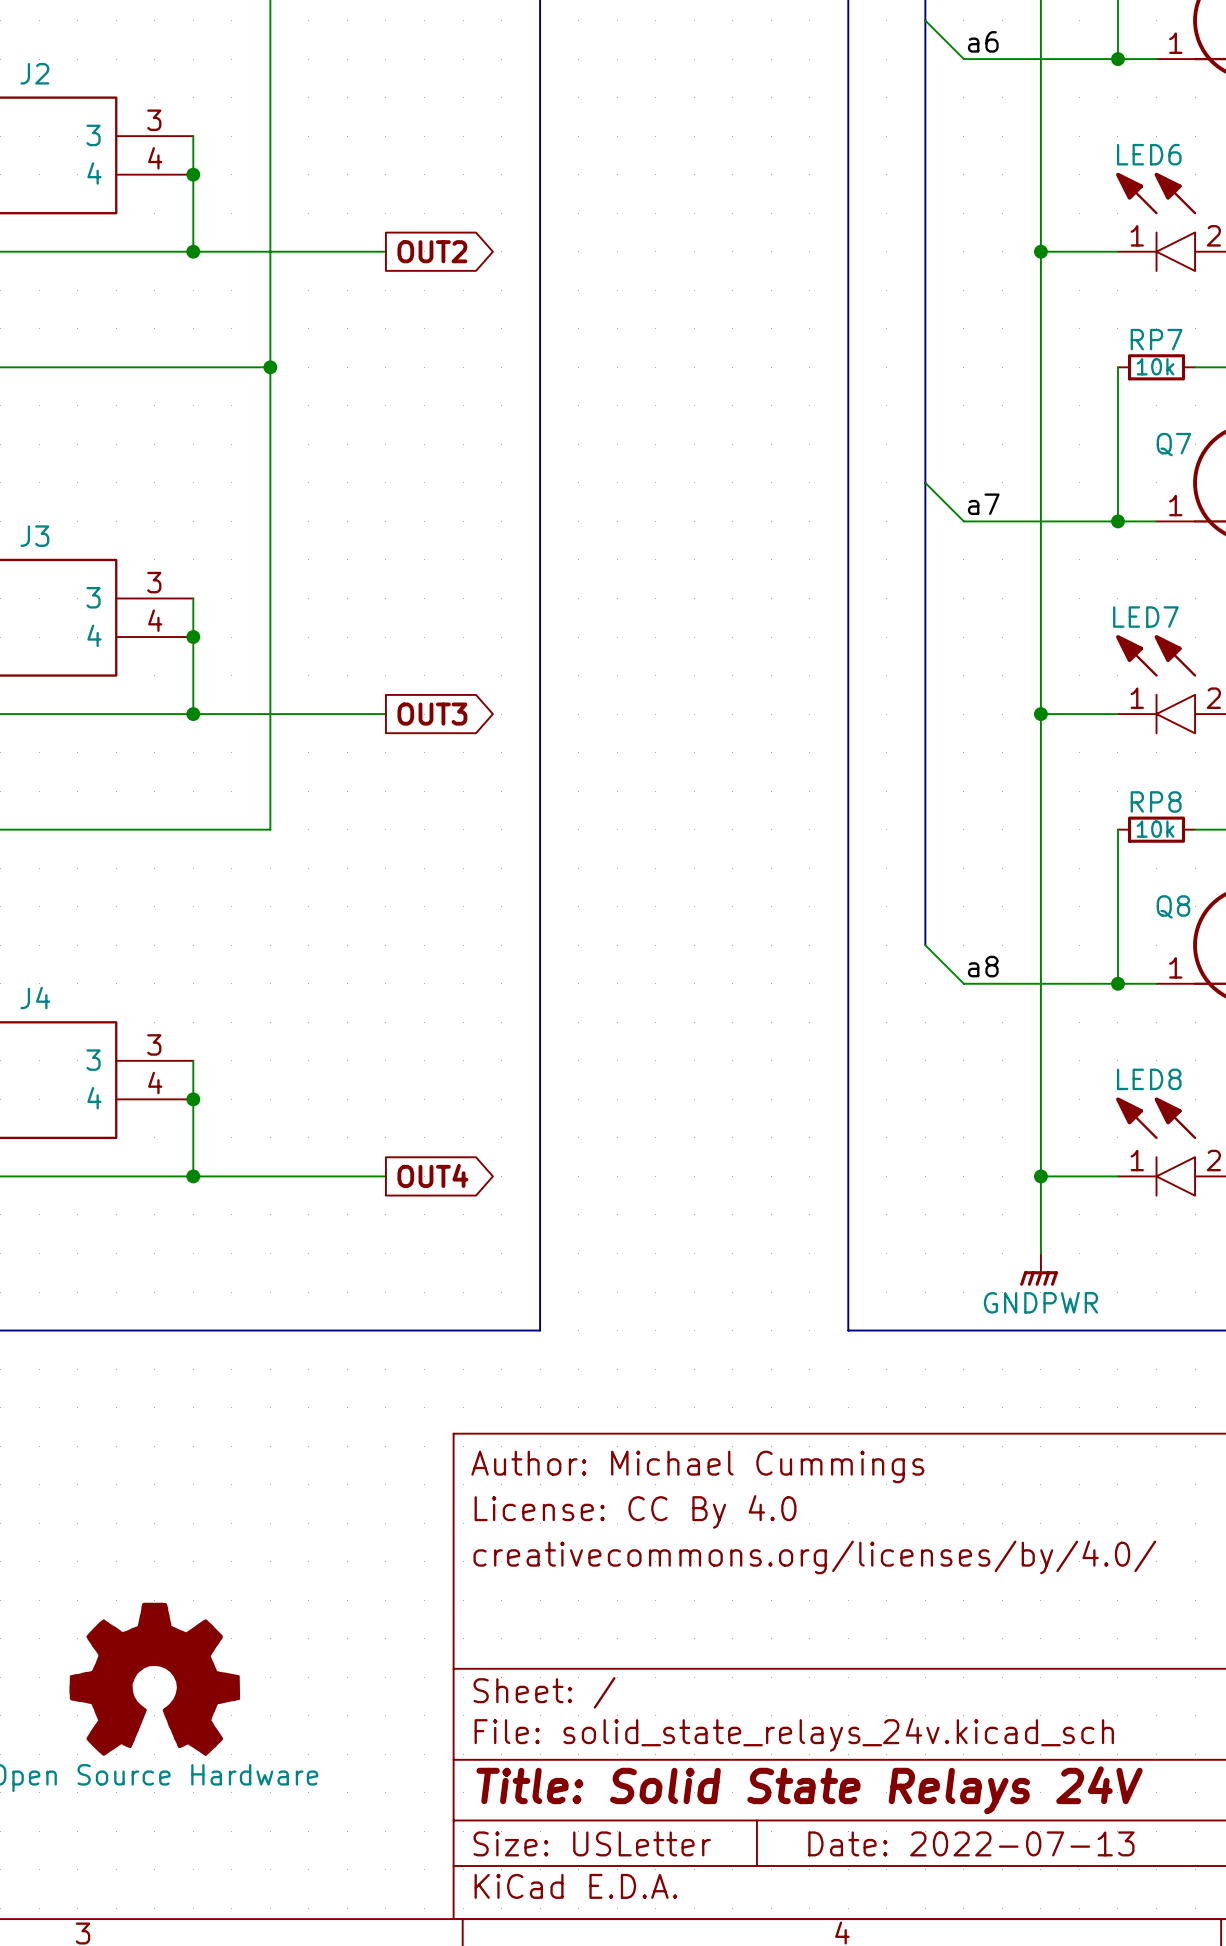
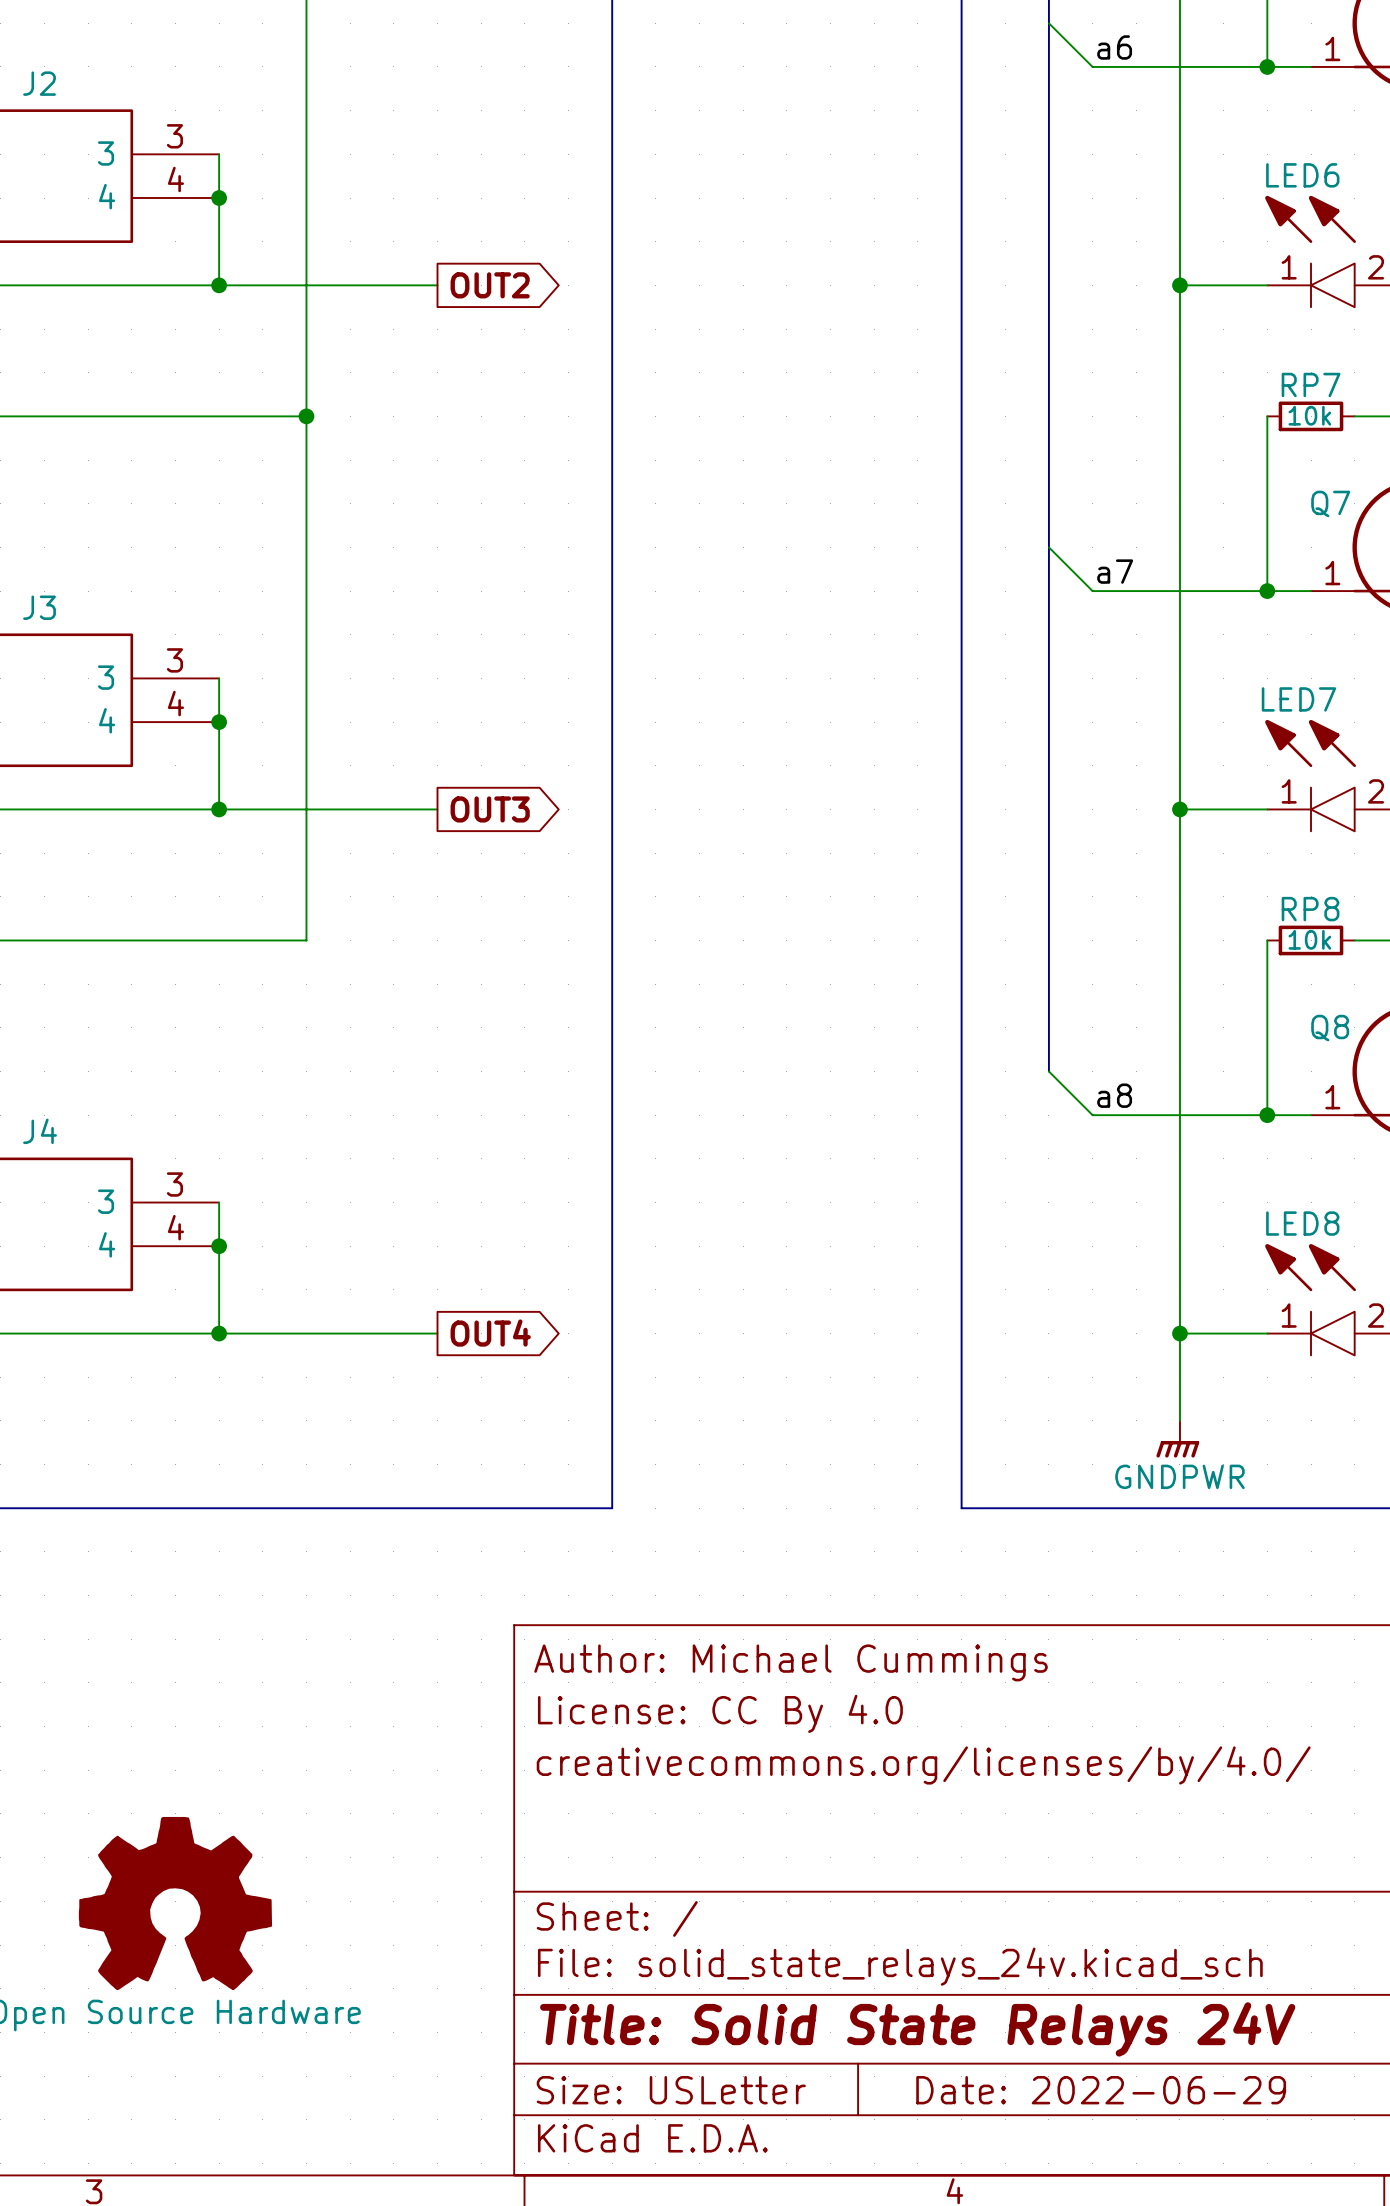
title block: Date: 2022-07-13 (971, 1843) -> Date: 2022-06-29 (1101, 2090)

